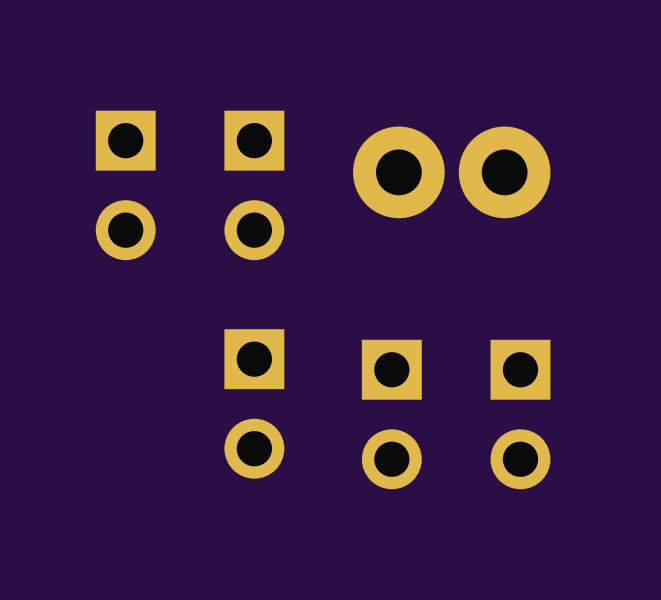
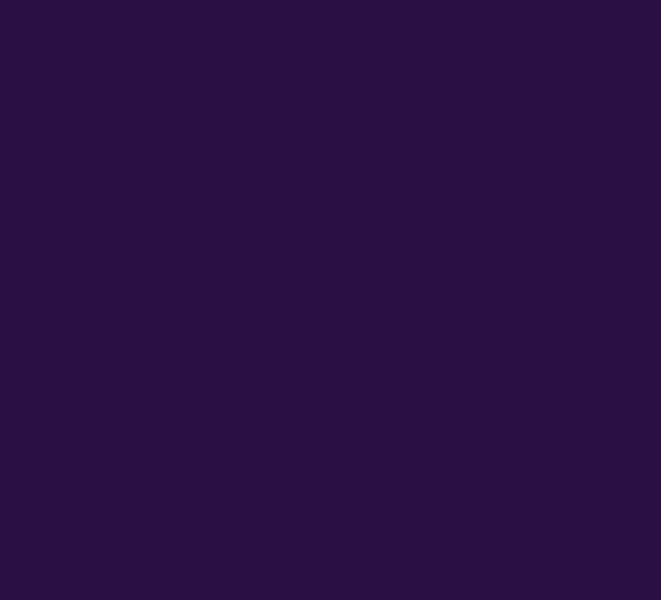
part: (451, 172) -> none
part: (125, 185) -> none
part: (254, 185) -> none
part: (254, 403) -> none
part: (391, 414) -> none
part: (520, 414) -> none

